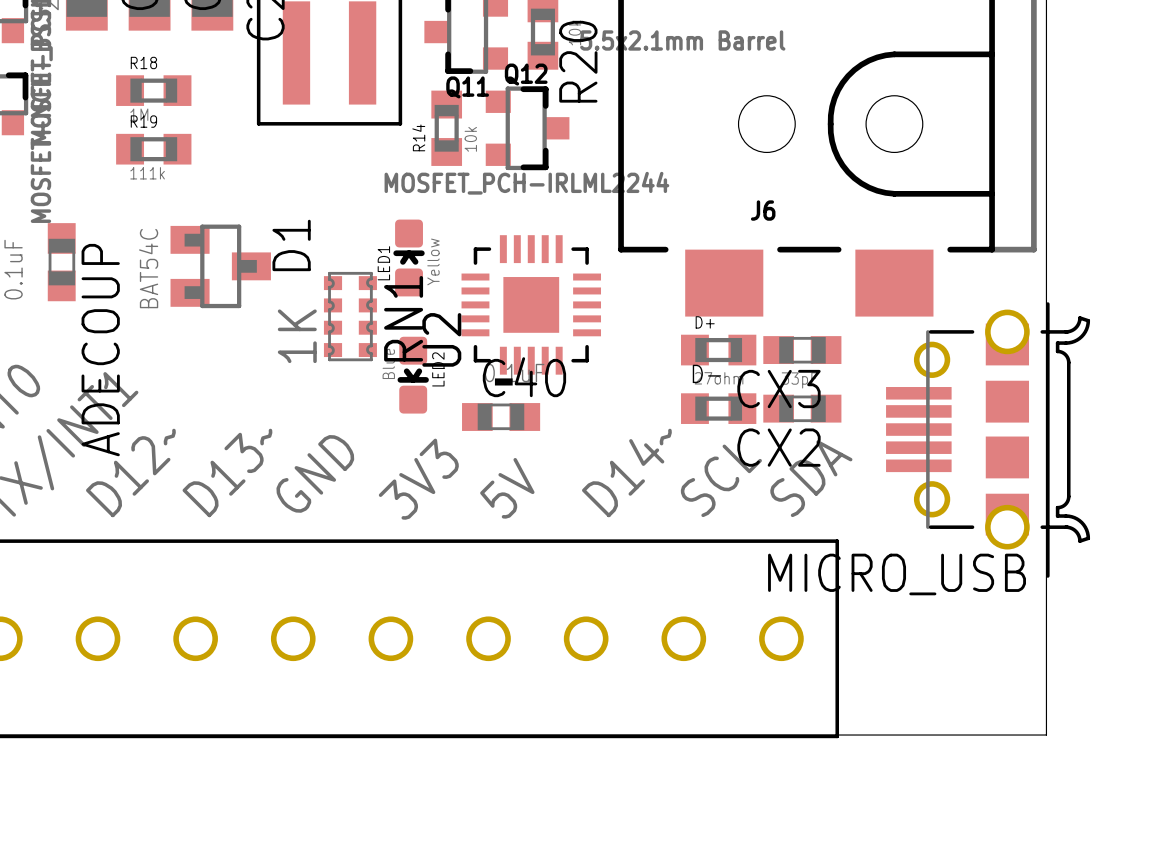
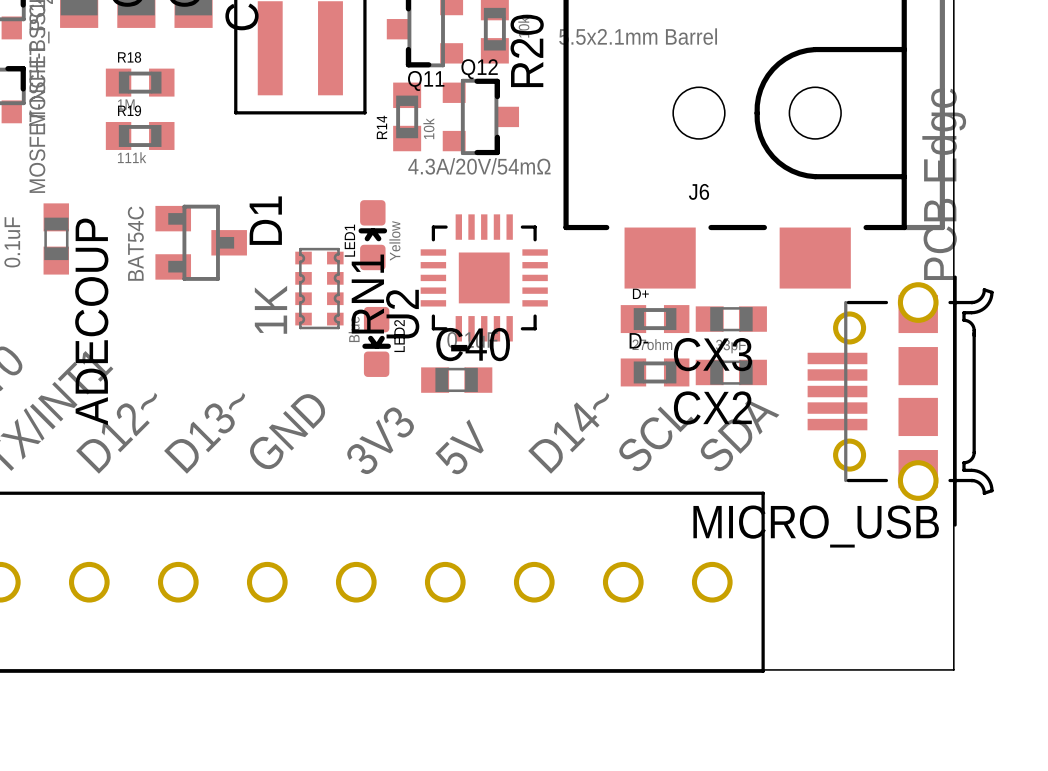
Q12 value: MOSFET_PCH-IRLML2244 (526, 183) -> 4.3A/20V/54mΩ (479, 166)
MICRO_USB footprint: [886, 302, 1091, 578] -> [807, 275, 994, 527]

